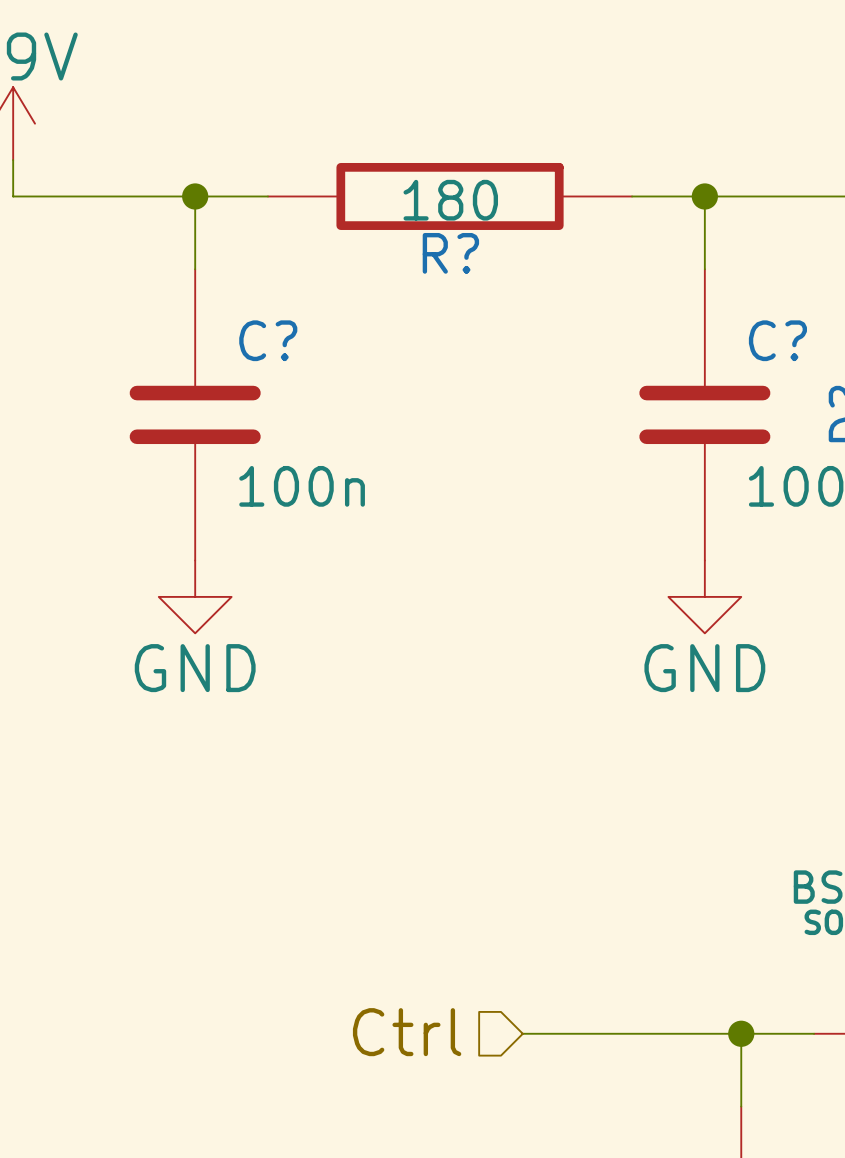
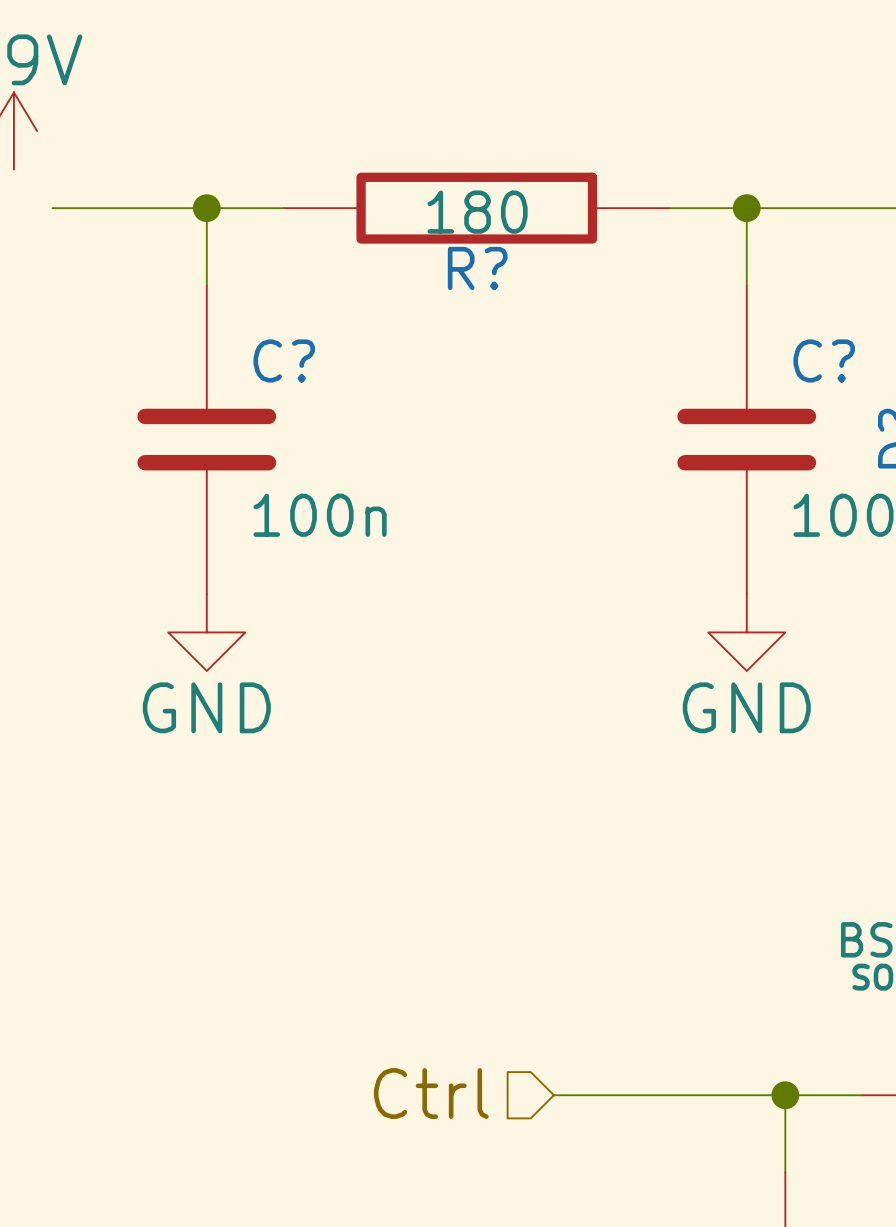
wire: (13, 160) (13, 196) (49, 196) -> none

